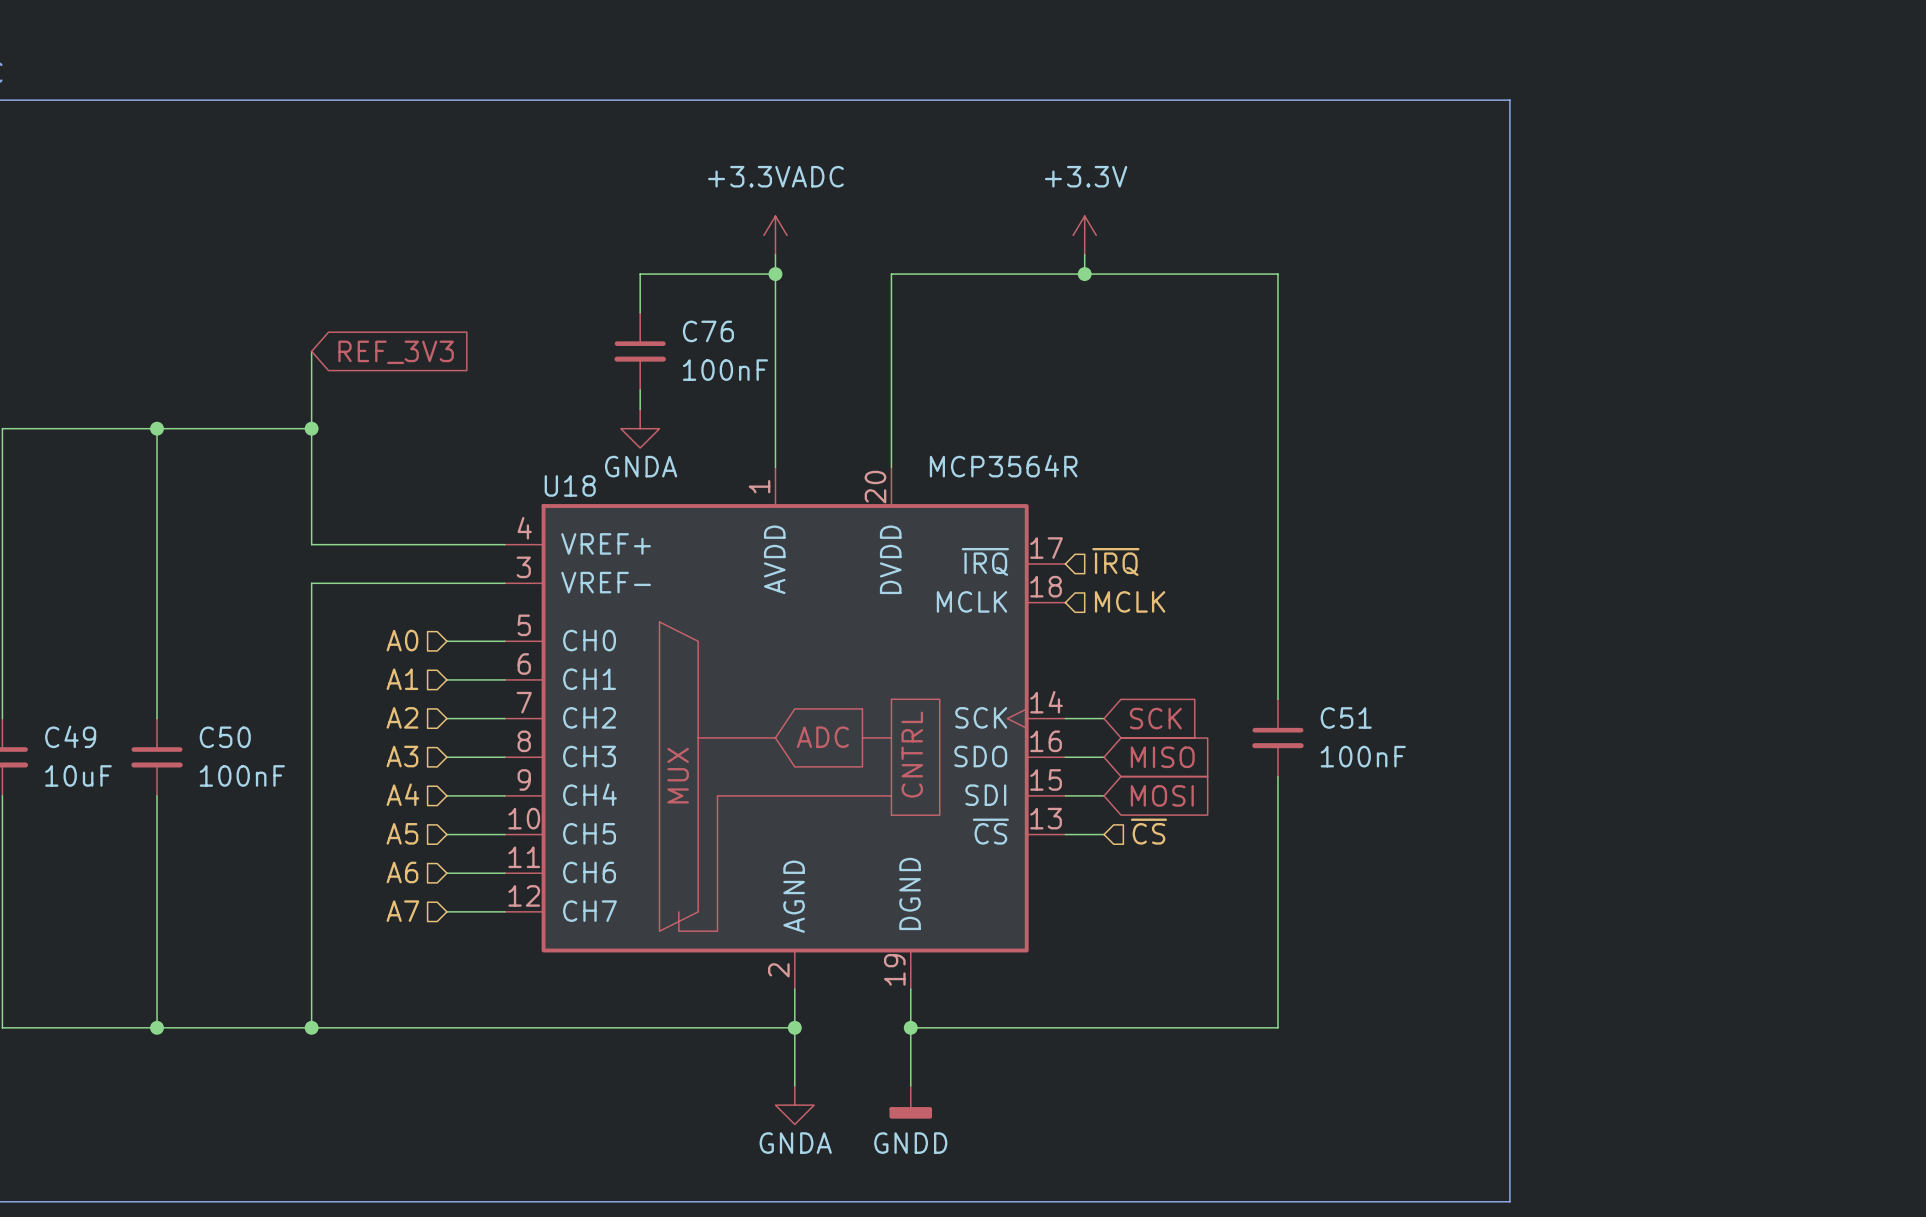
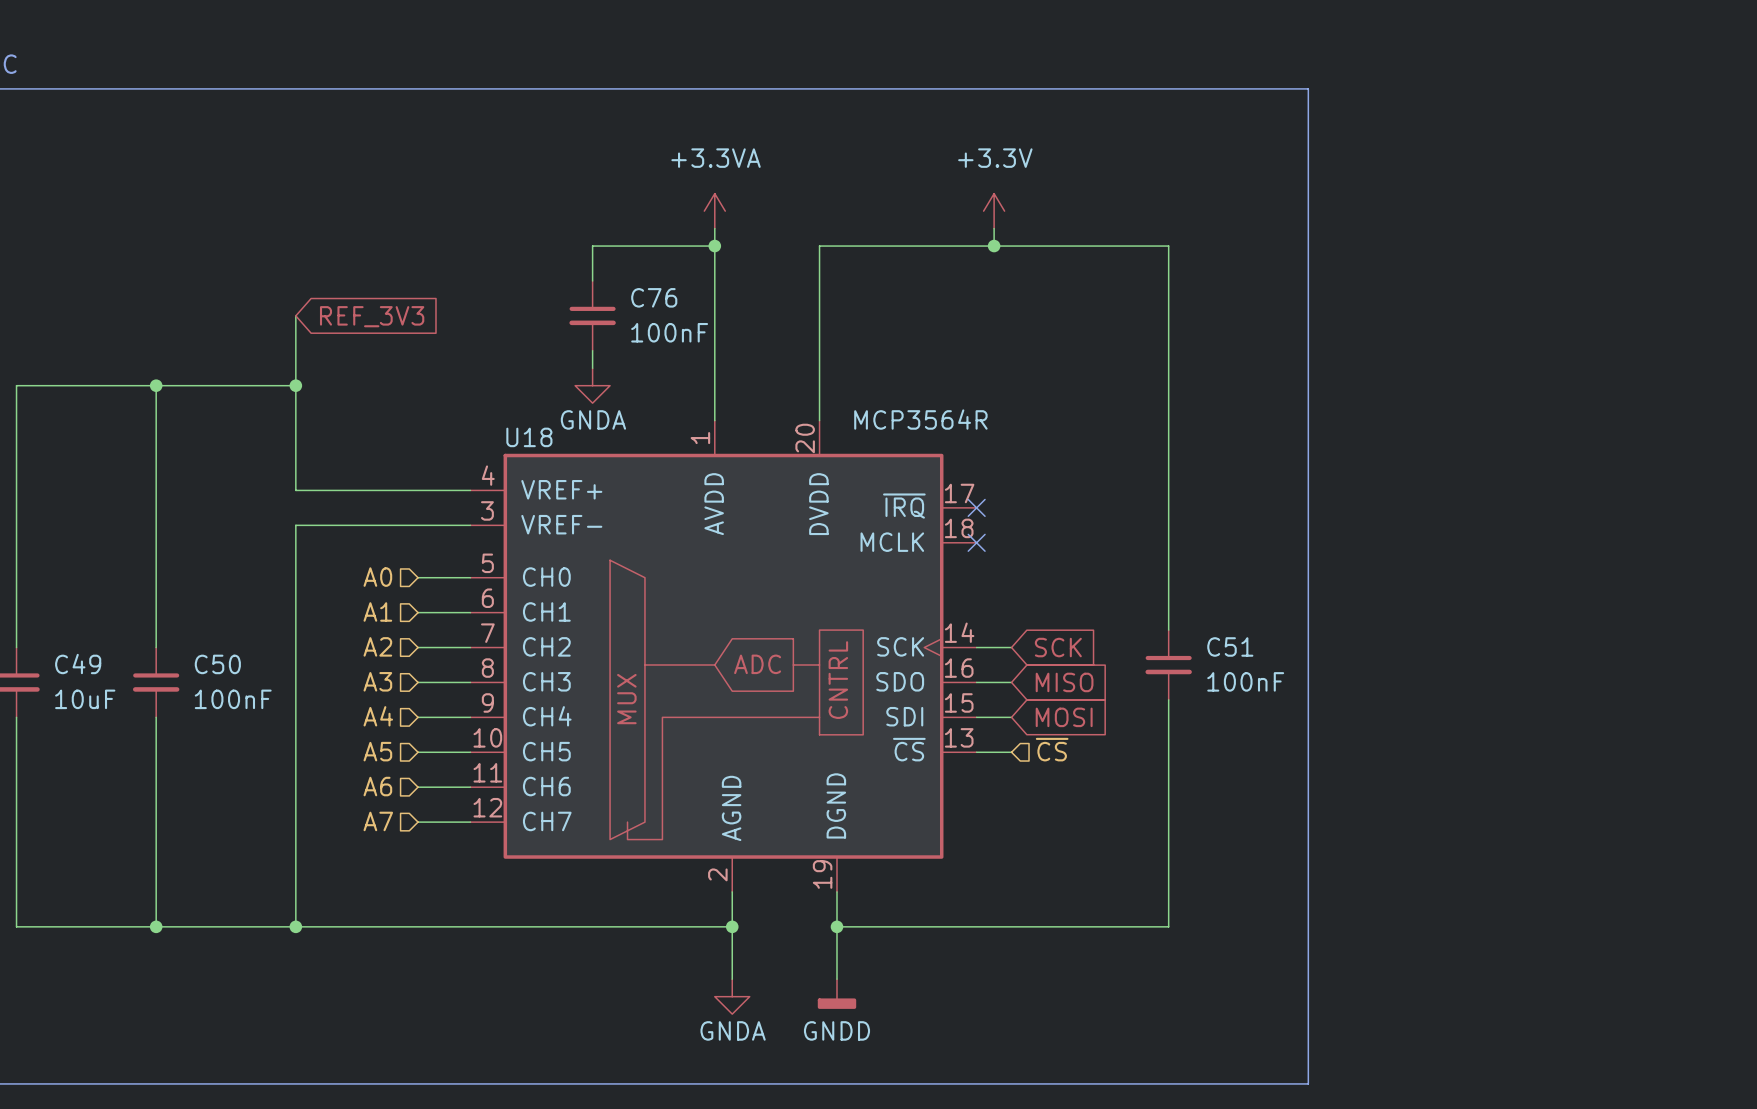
line: (1432, 100) (1509, 100) (1509, 1201) (1432, 1201) -> (1308, 88) (1308, 1083)
power symbol: +3.3VADC (775, 235) -> +3.3VA (714, 211)
hierarchical label: ~{IRQ} (1115, 561) -> none
no-connect mark: none -> (976, 507)
hierarchical label: MCLK (1130, 601) -> none
no-connect mark: none -> (976, 542)

